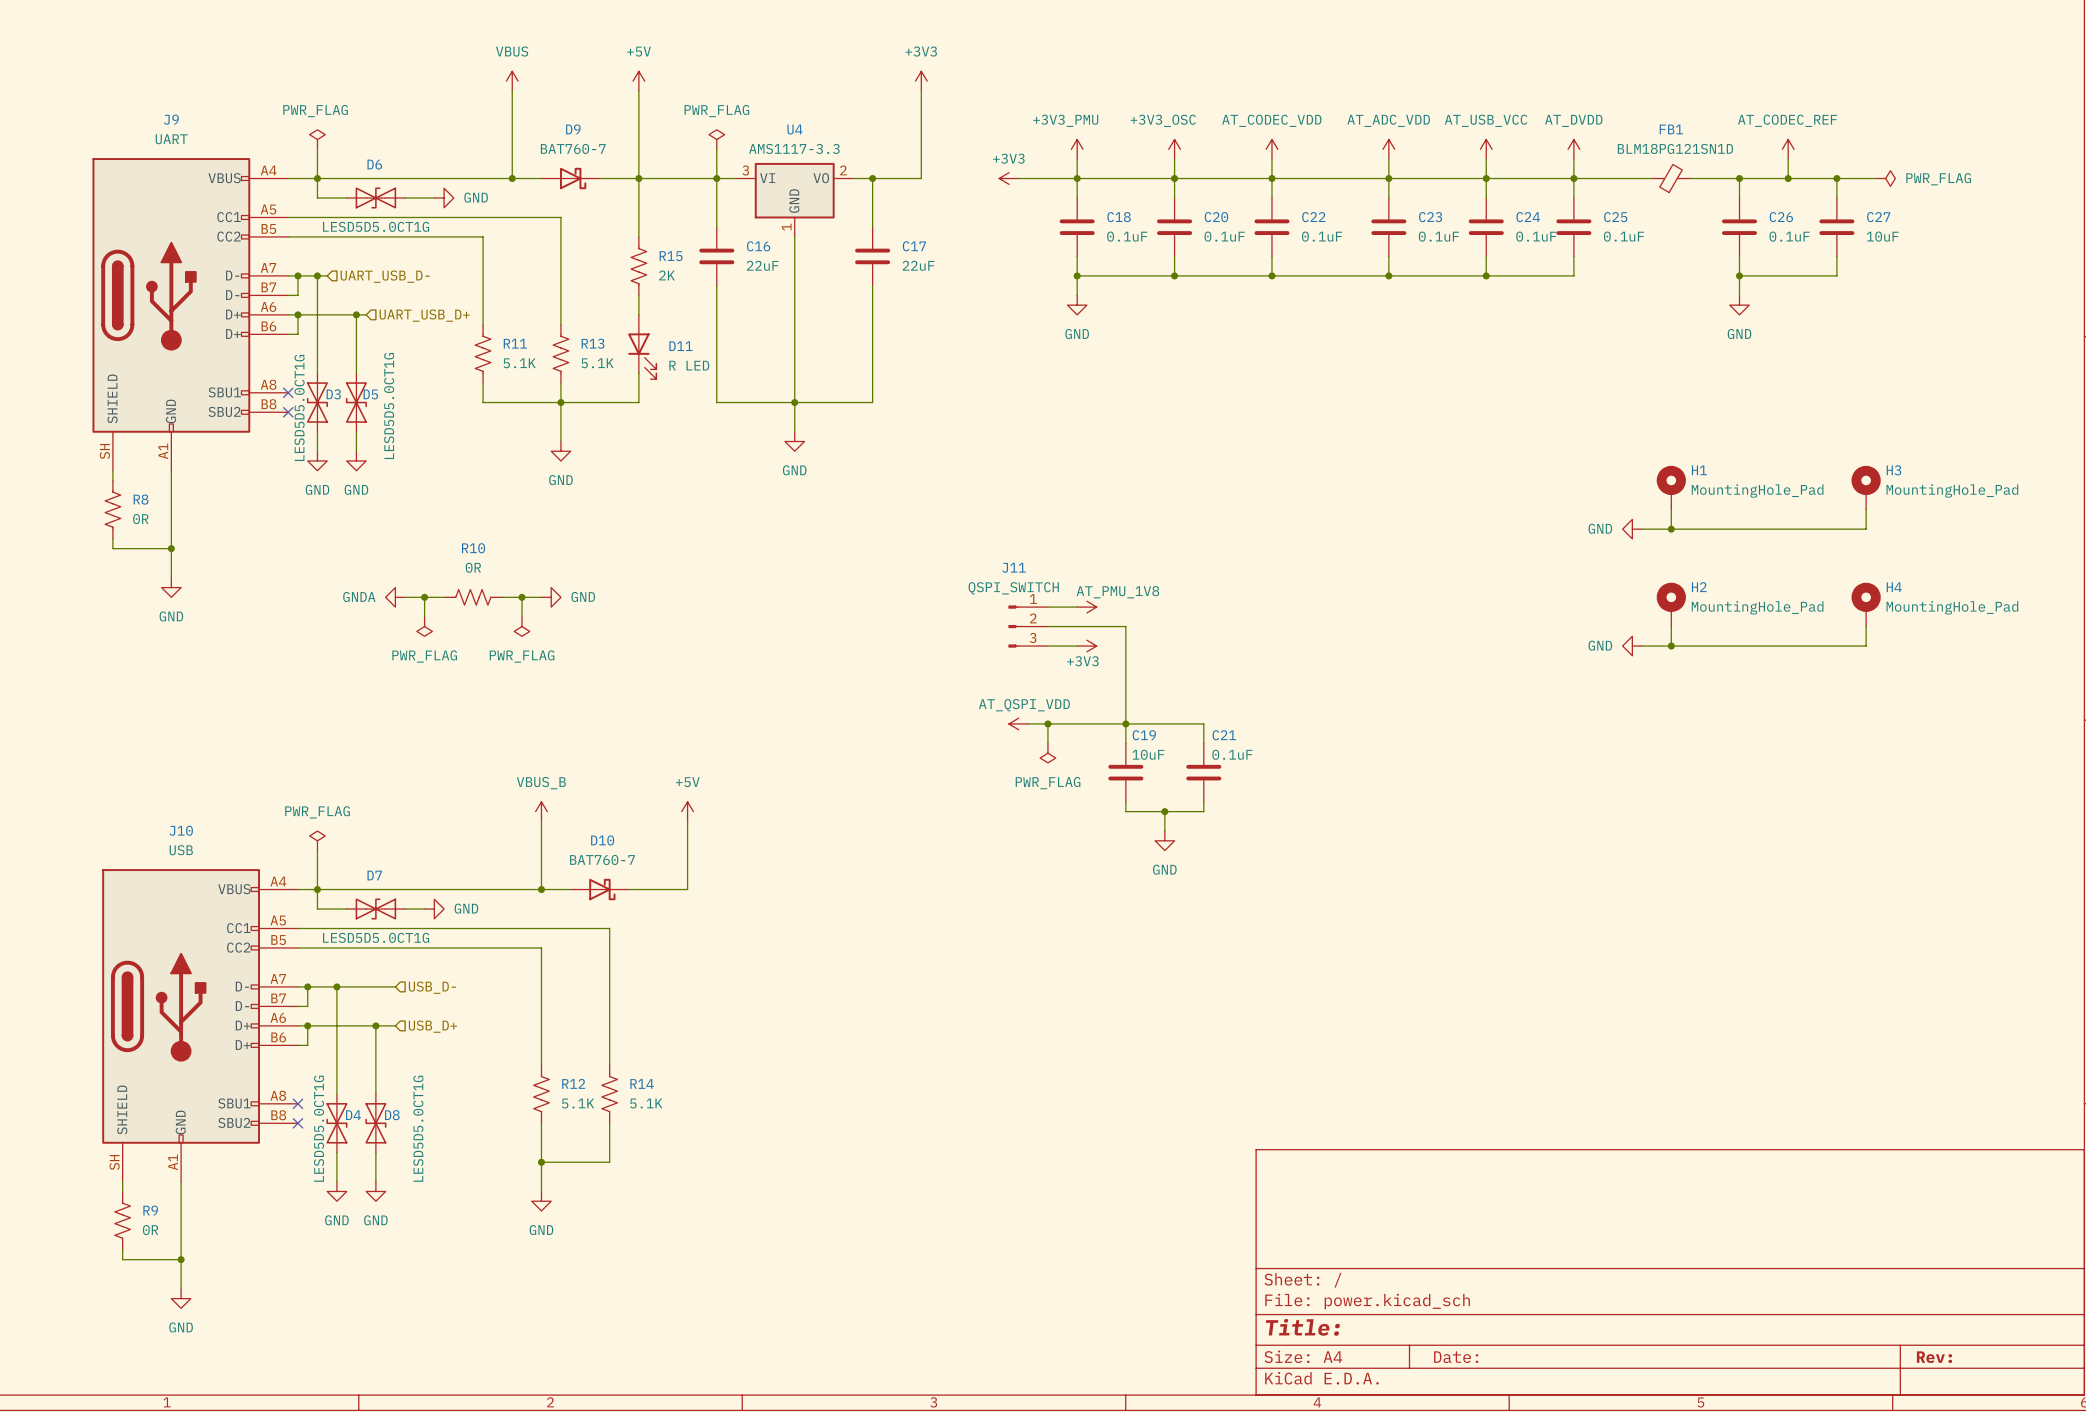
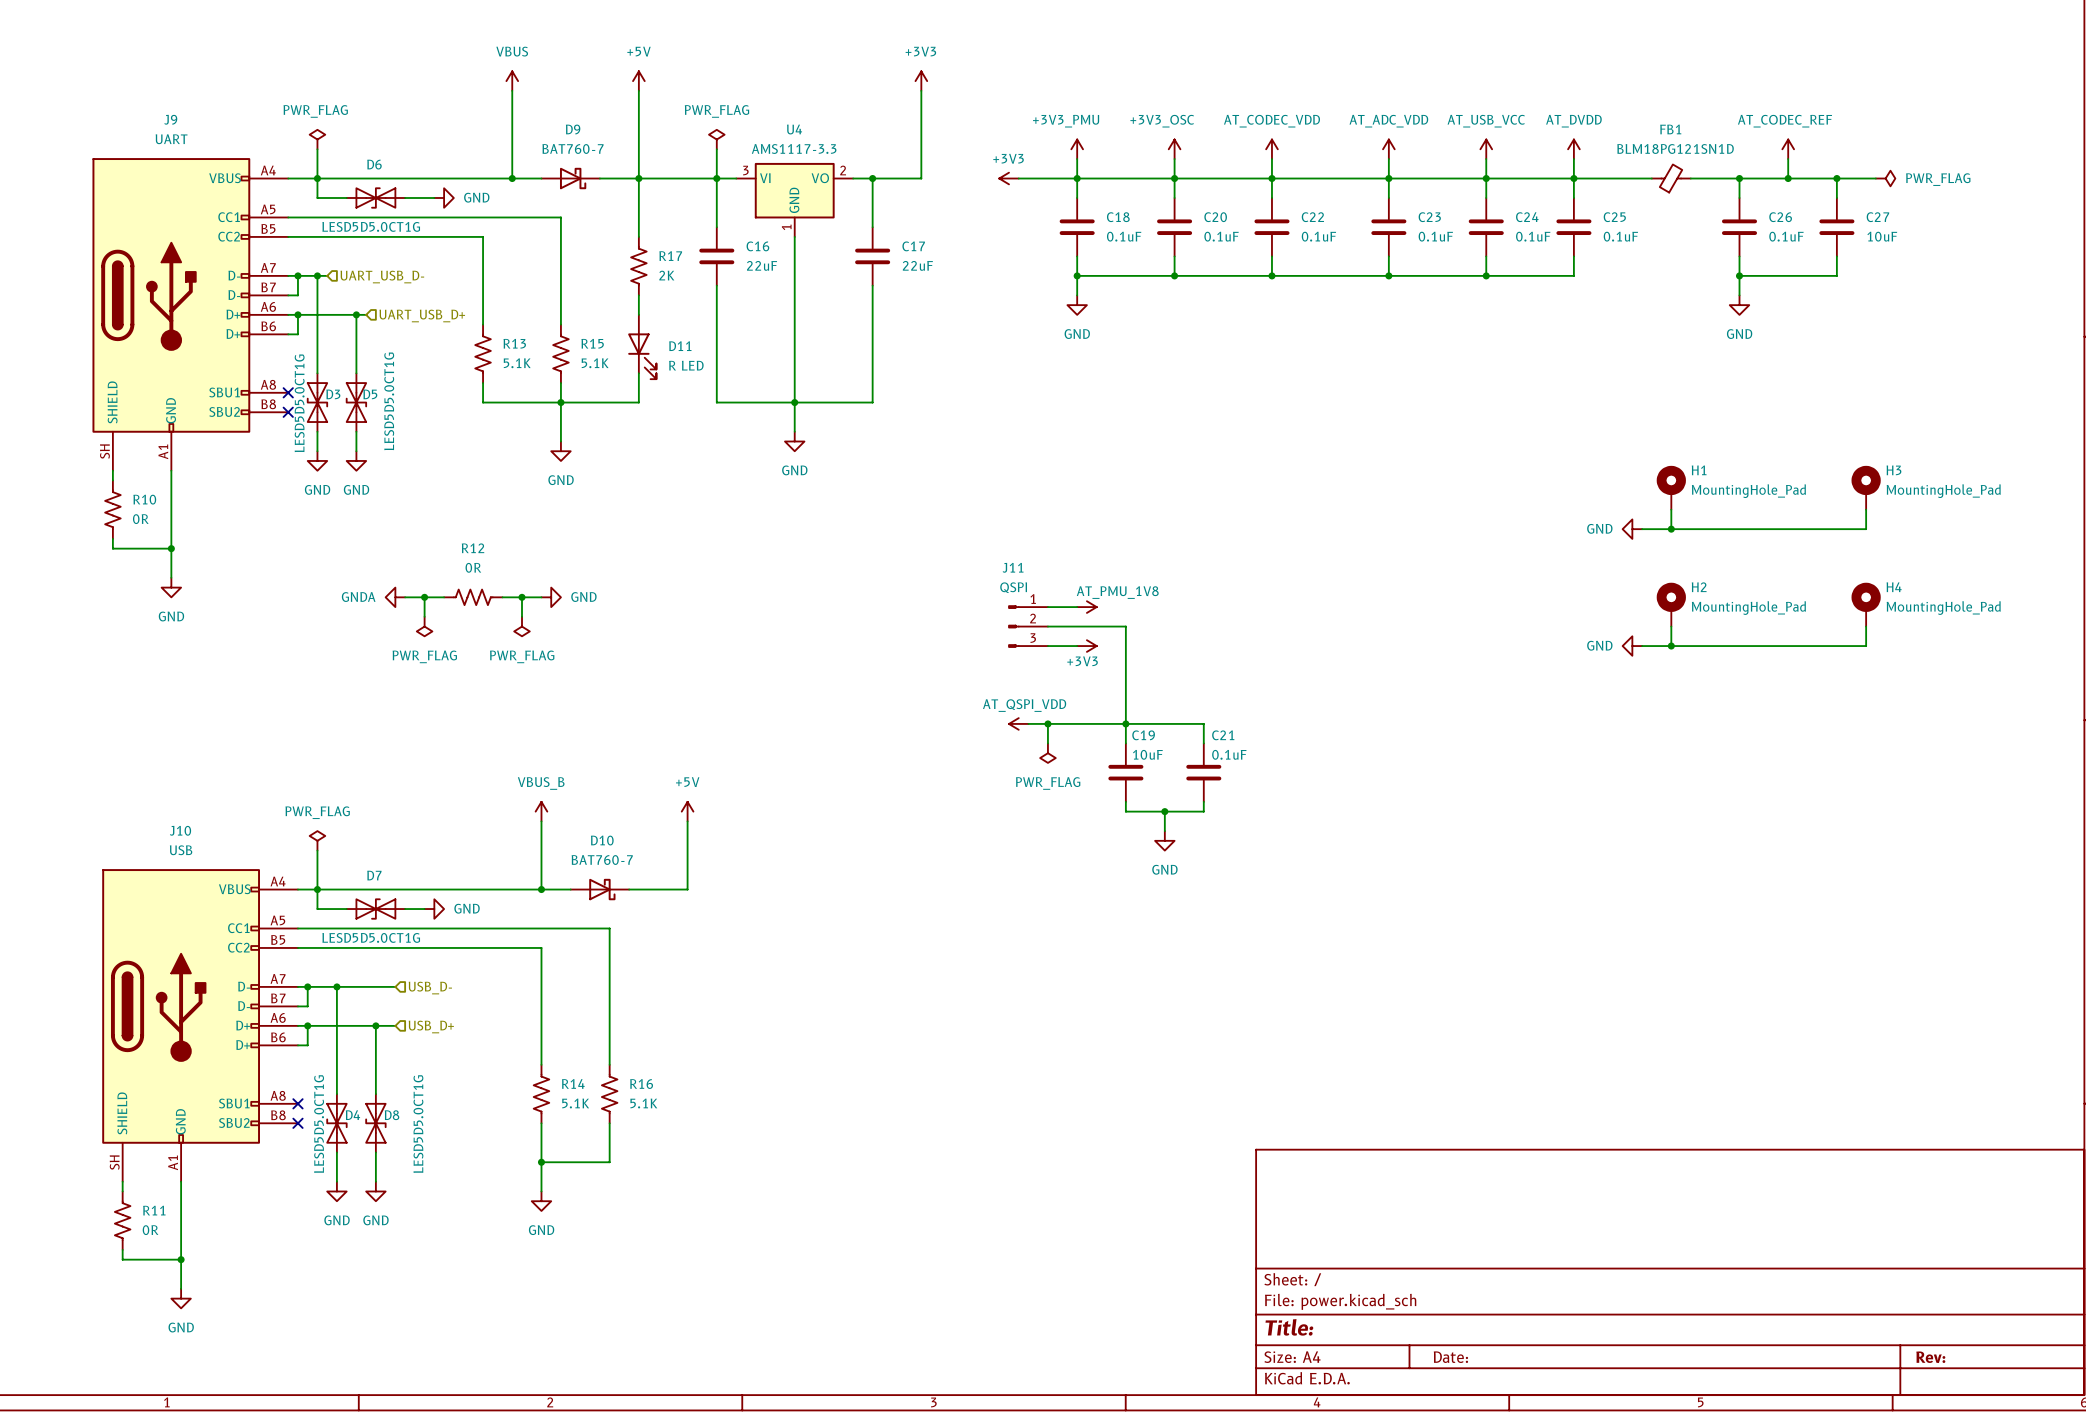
R15 name: R15 (671, 256) -> R17 (670, 256)
R11 name: R11 (515, 343) -> R13 (514, 343)
R13 name: R13 (593, 343) -> R15 (592, 343)
R8 name: R8 (141, 499) -> R10 (144, 499)
R10 name: R10 (473, 548) -> R12 (473, 548)
J11 value: QSPI_SWITCH (1013, 588) -> QSPI (1013, 587)
R12 name: R12 (573, 1083) -> R14 (573, 1083)
R14 name: R14 (642, 1083) -> R16 (641, 1084)
R9 name: R9 (150, 1210) -> R11 (154, 1210)

